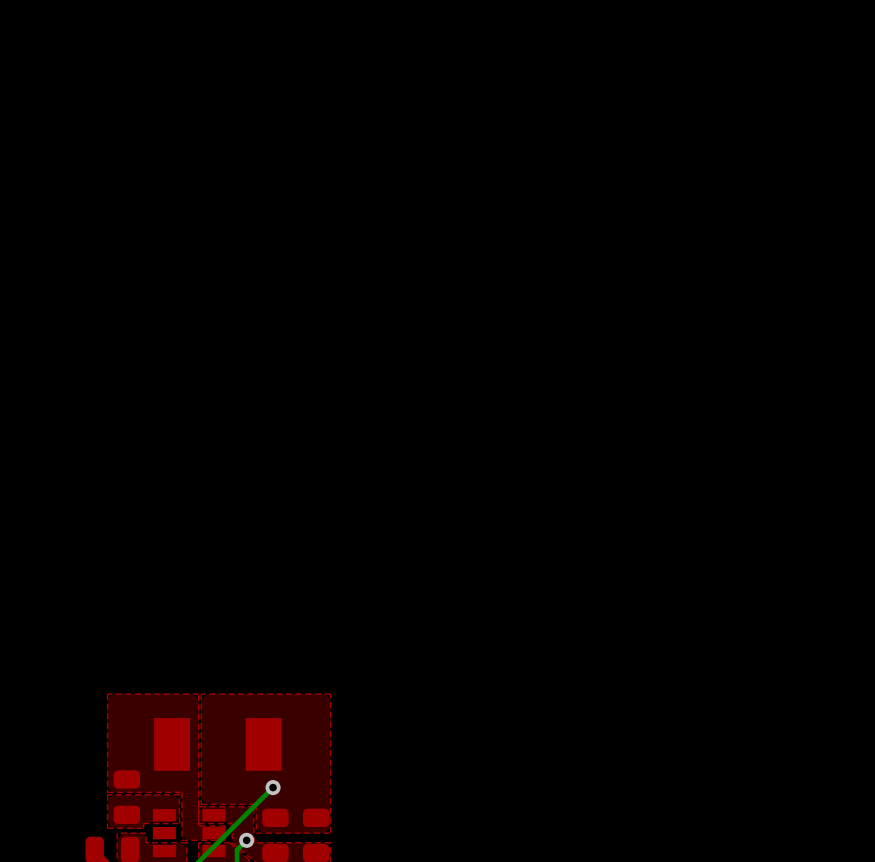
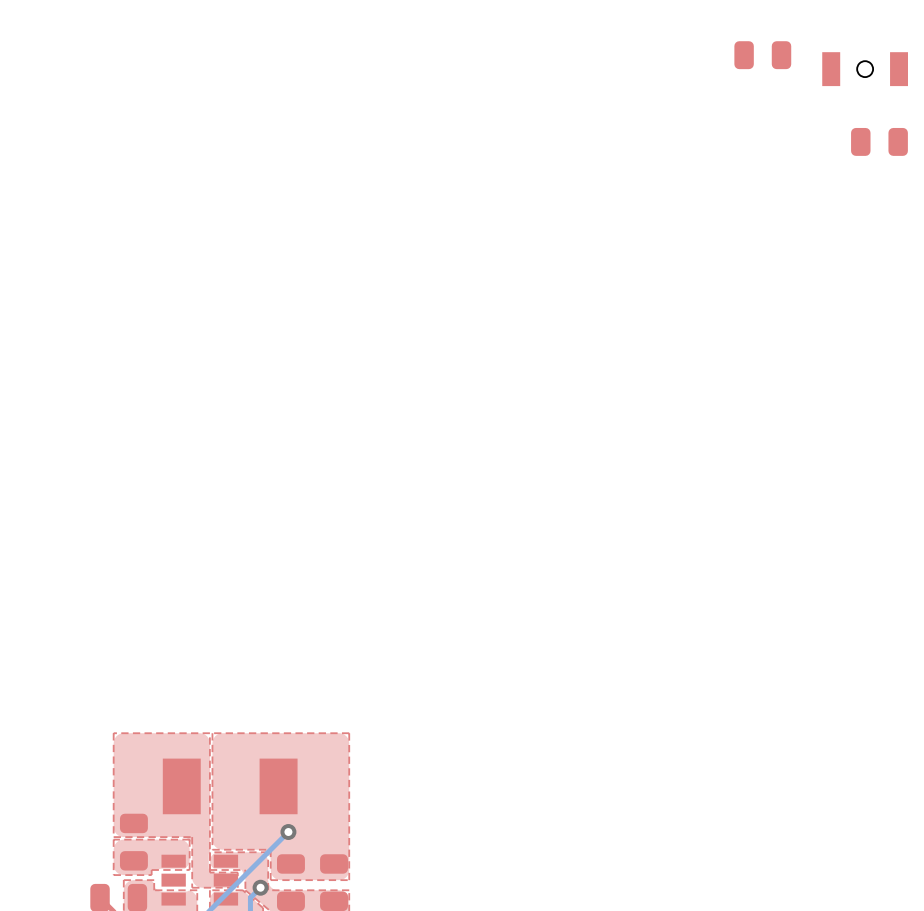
part: none -> (762, 55)
part: none -> (865, 69)
part: none -> (879, 141)

